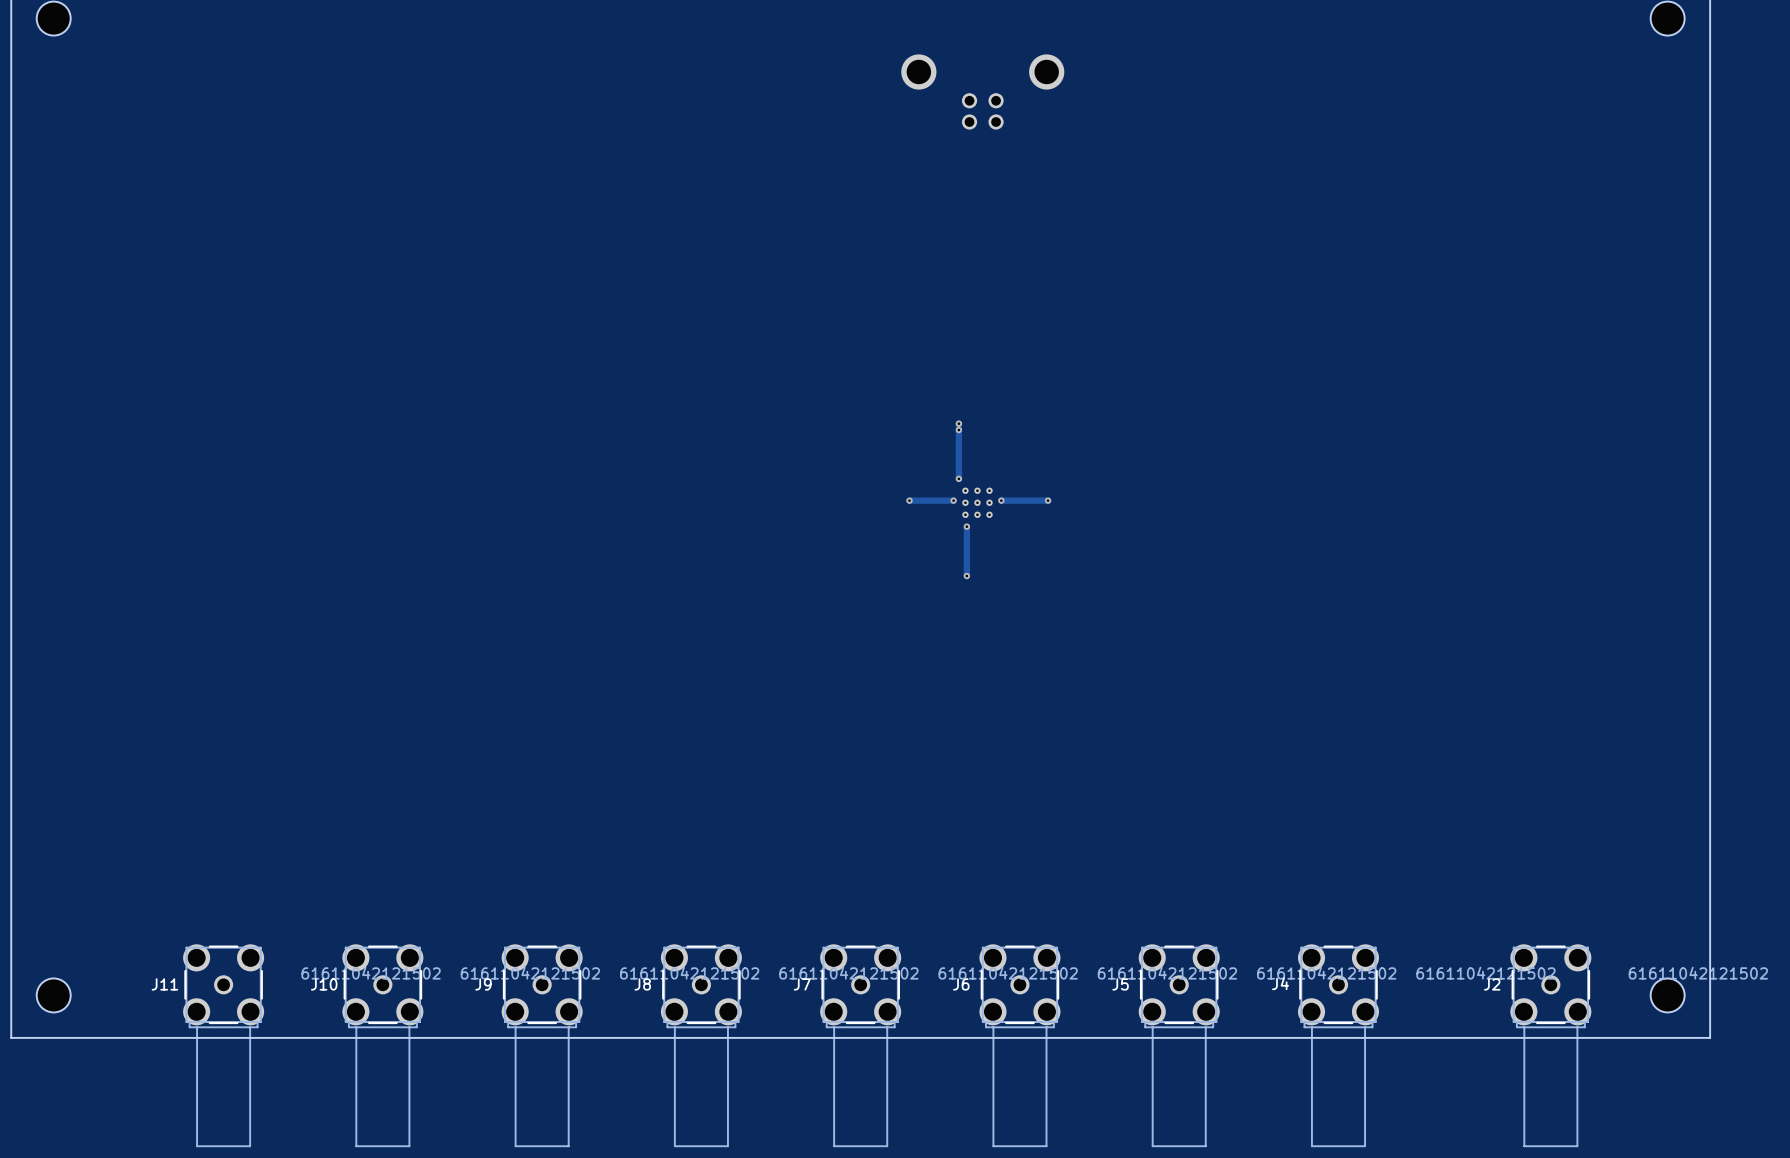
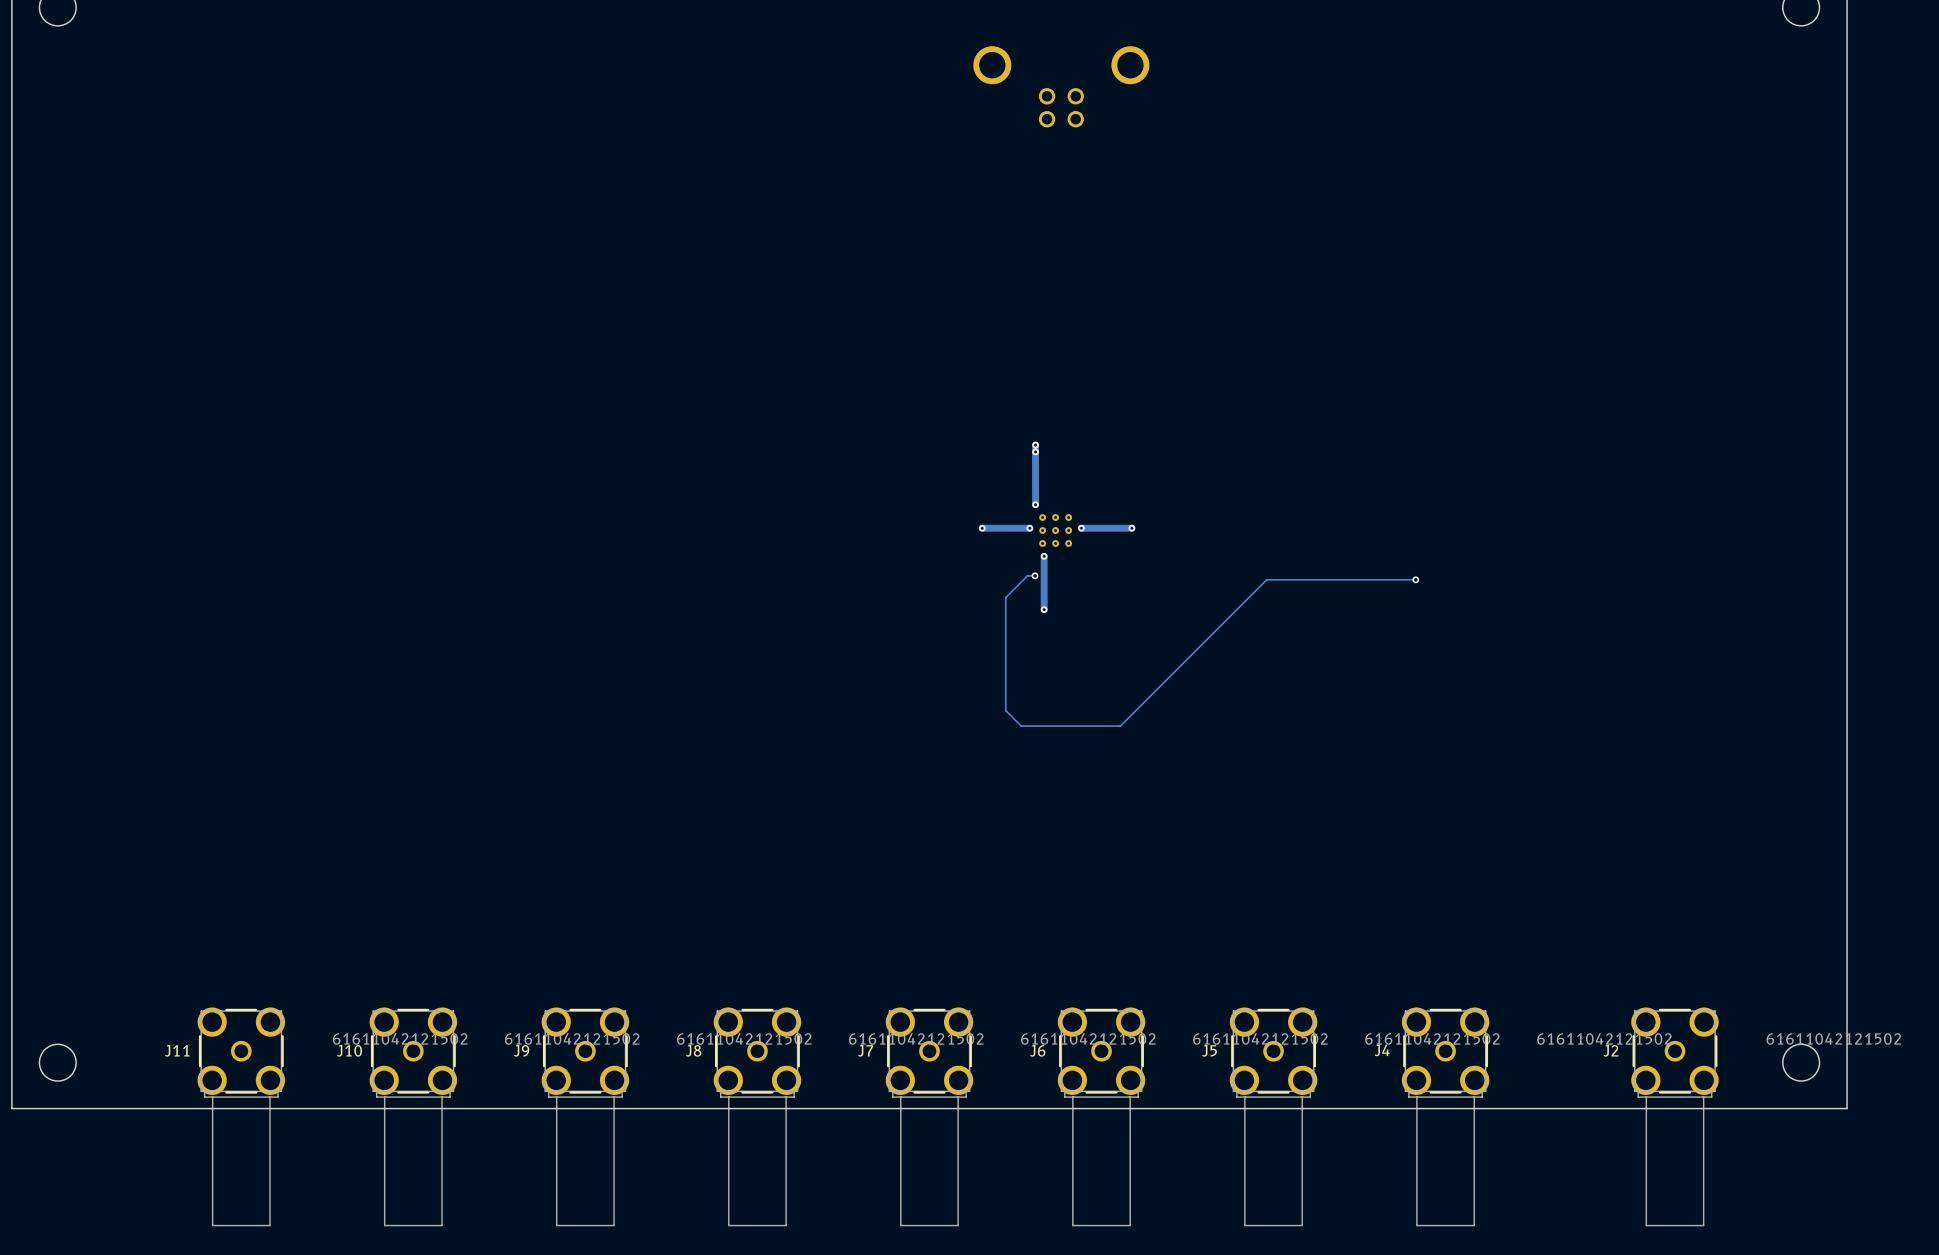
track: none -> (1034, 575) (1027, 575) (1005, 597) (1005, 710) (1021, 726) (1120, 726) (1266, 579) (1415, 579)
via: none -> (1034, 575)
via: none -> (1415, 579)

